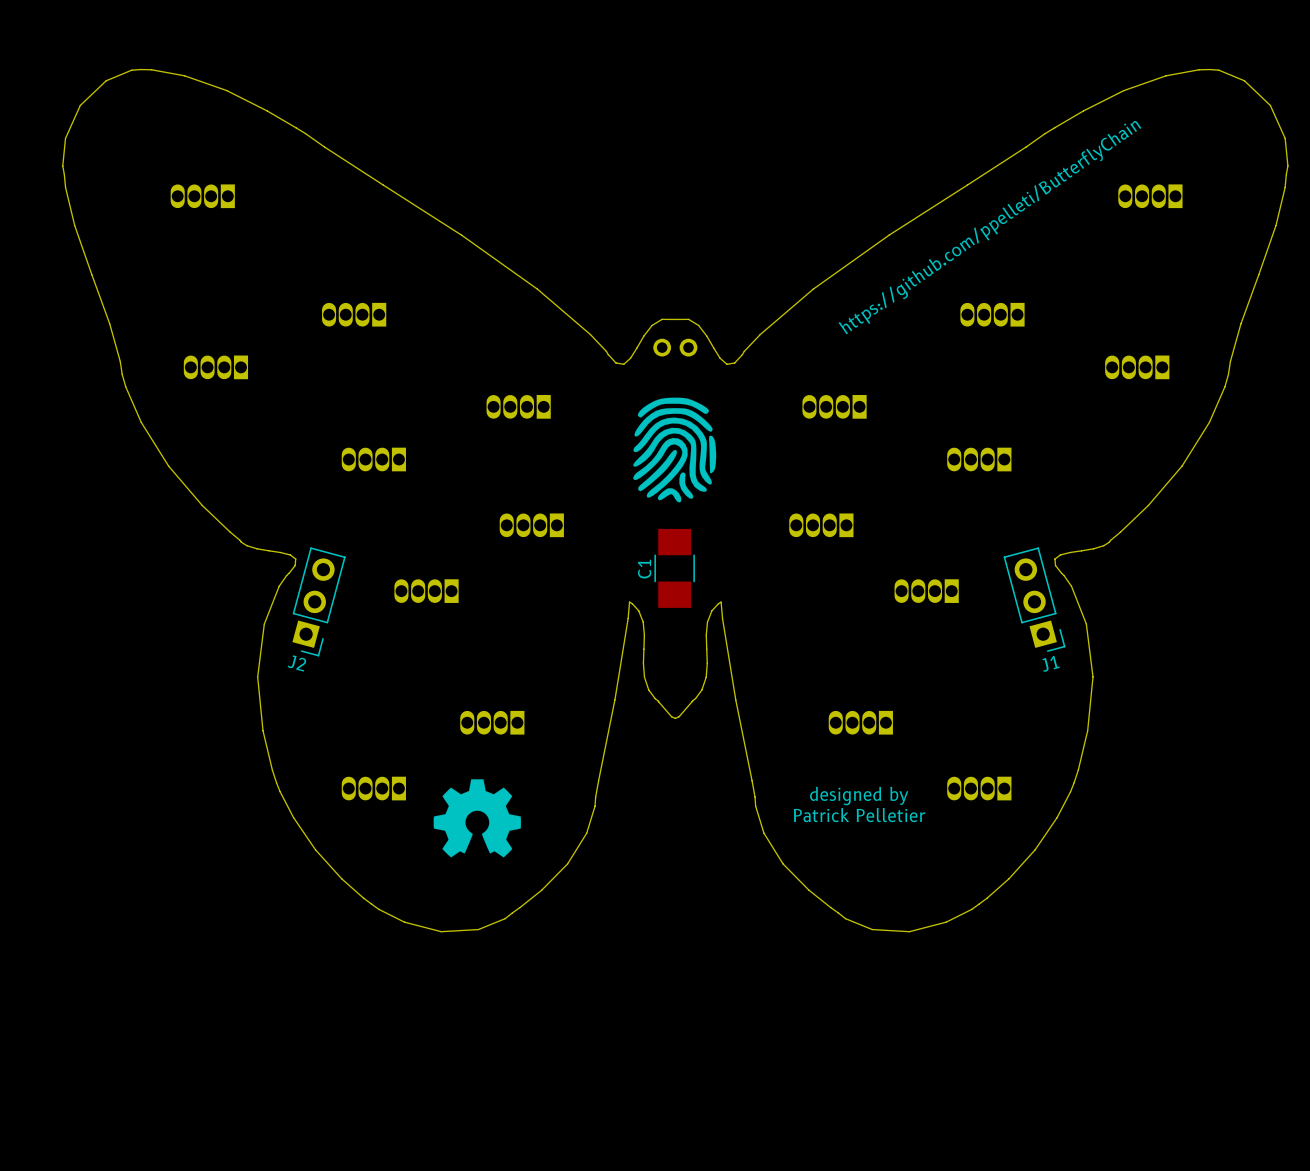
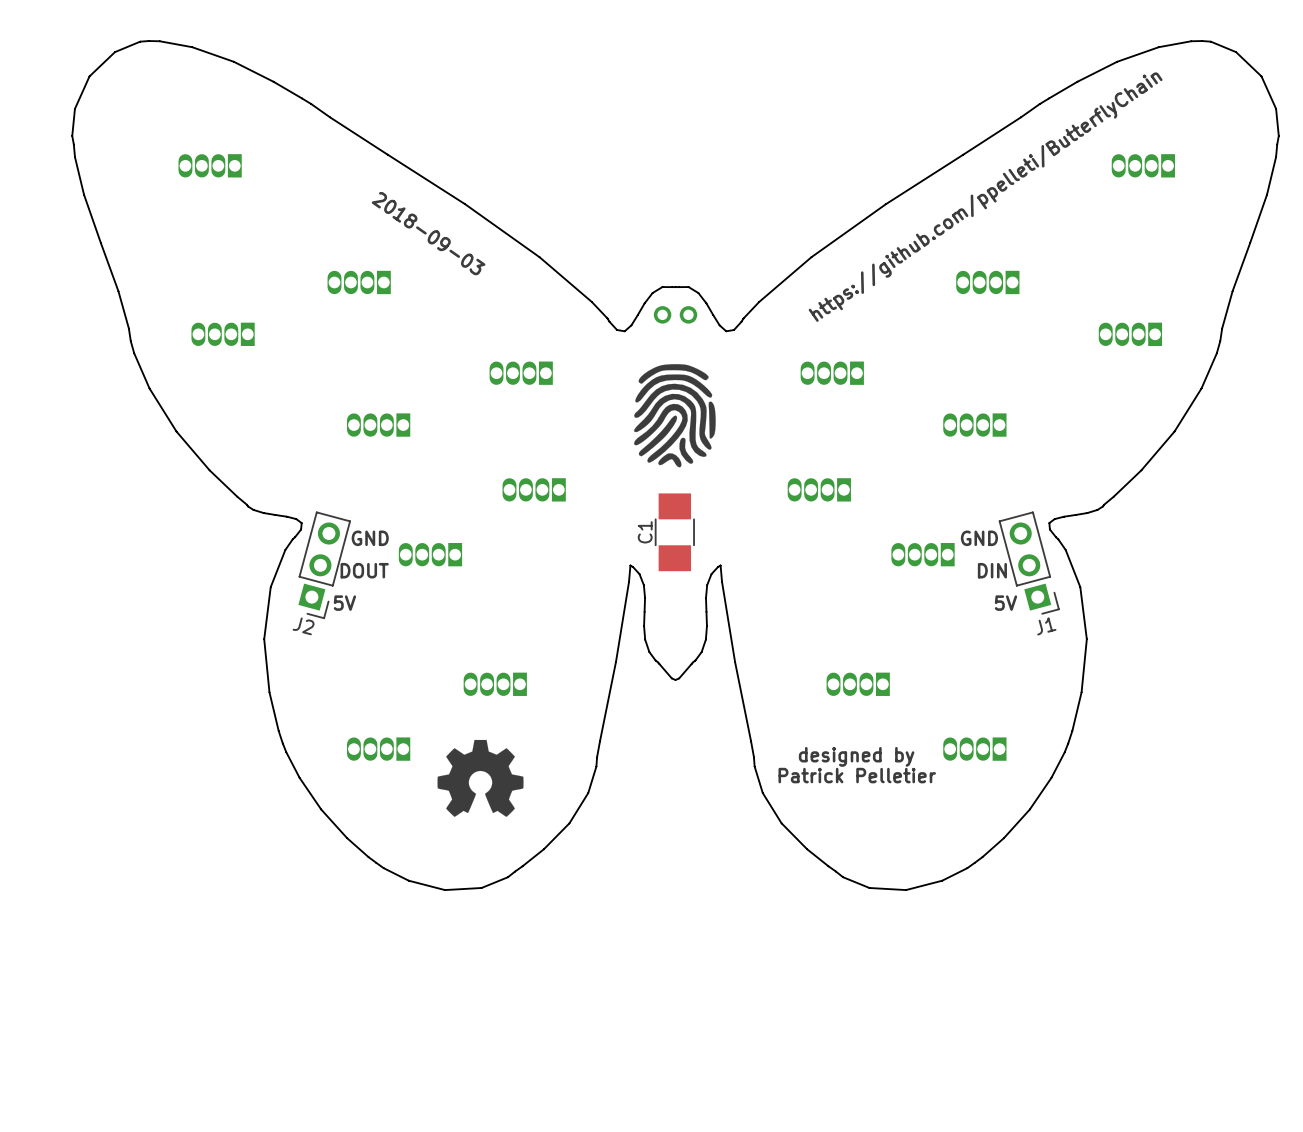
text: none -> 2018-09-03 (428, 233)
text: none -> GND (370, 538)
text: none -> GND (979, 538)
text: none -> DOUT (364, 570)
text: none -> DIN (992, 570)
text: none -> 5V (344, 603)
text: none -> 5V (1005, 603)

